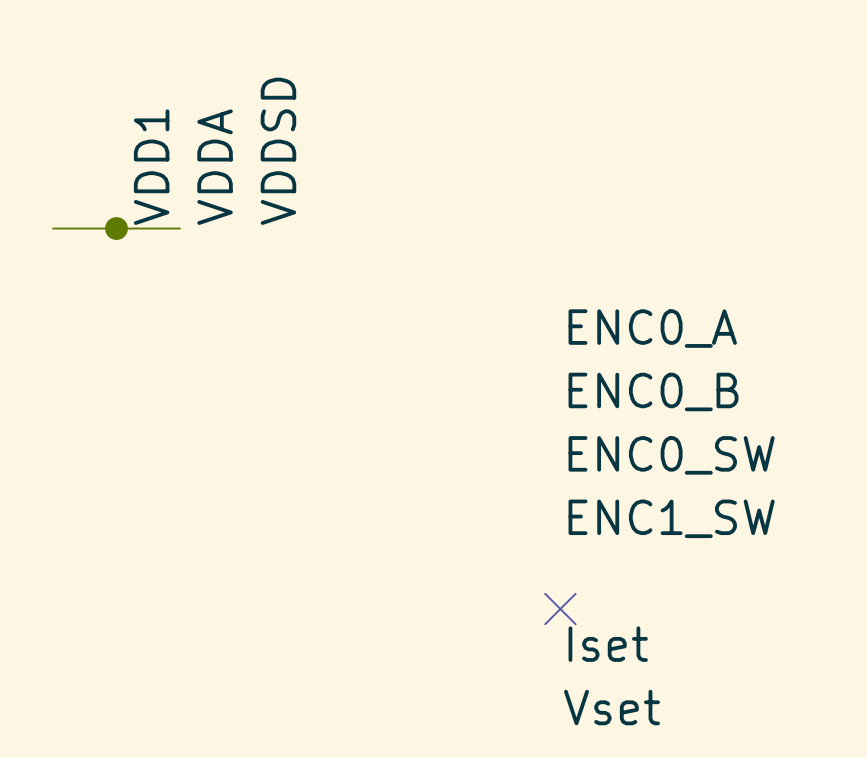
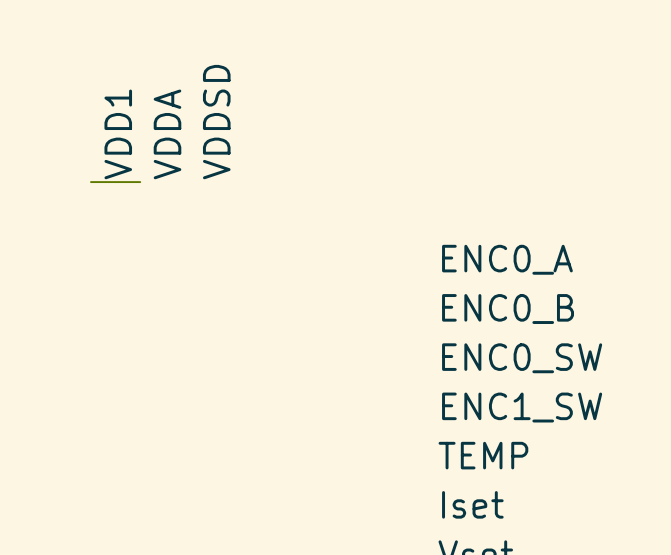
wire: (53, 228) (116, 228) -> none
junction: (116, 228) -> none
label: none -> TEMP (483, 455)
no-connect mark: (560, 609) -> none

